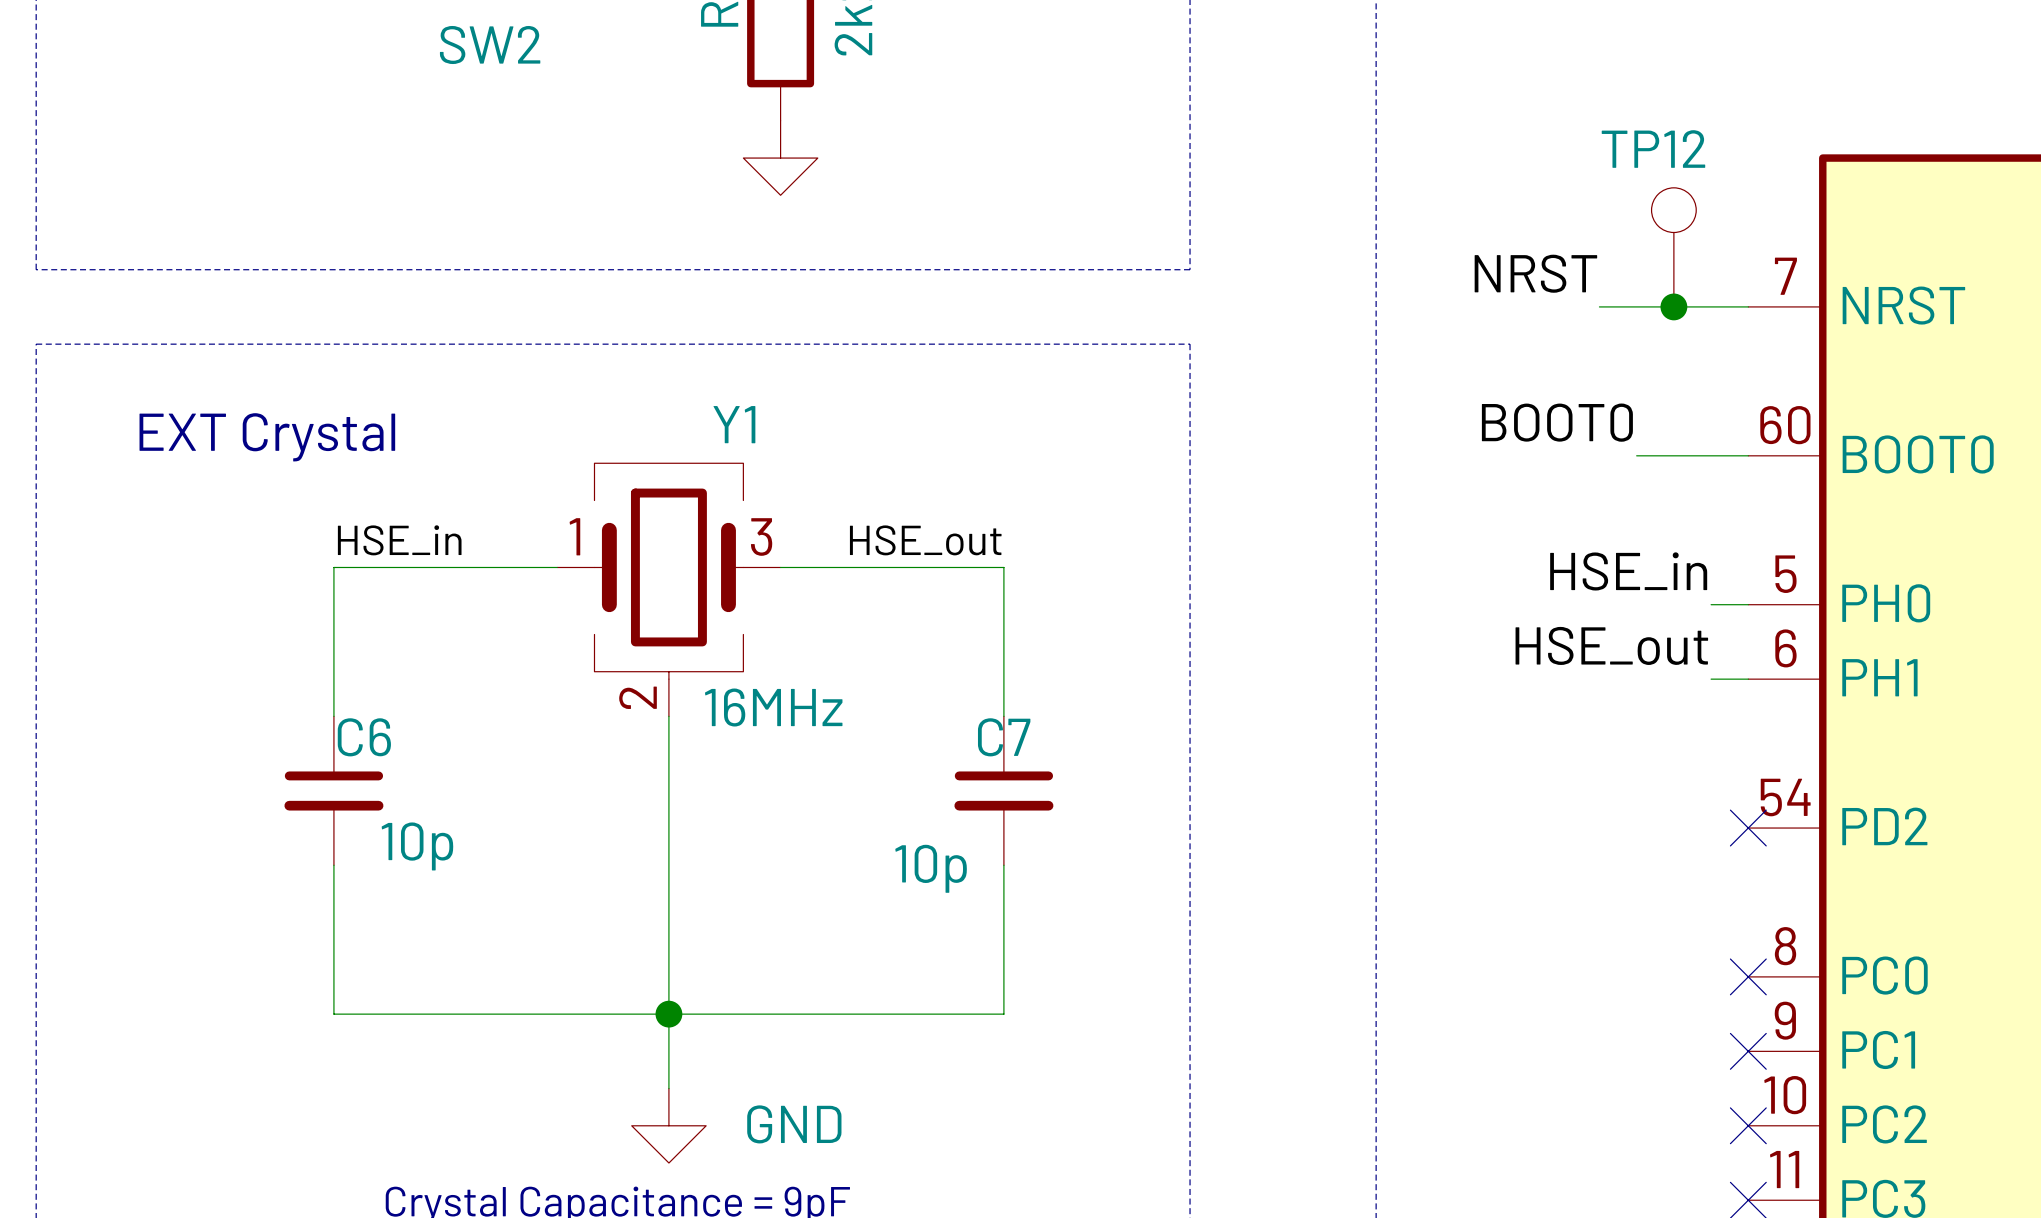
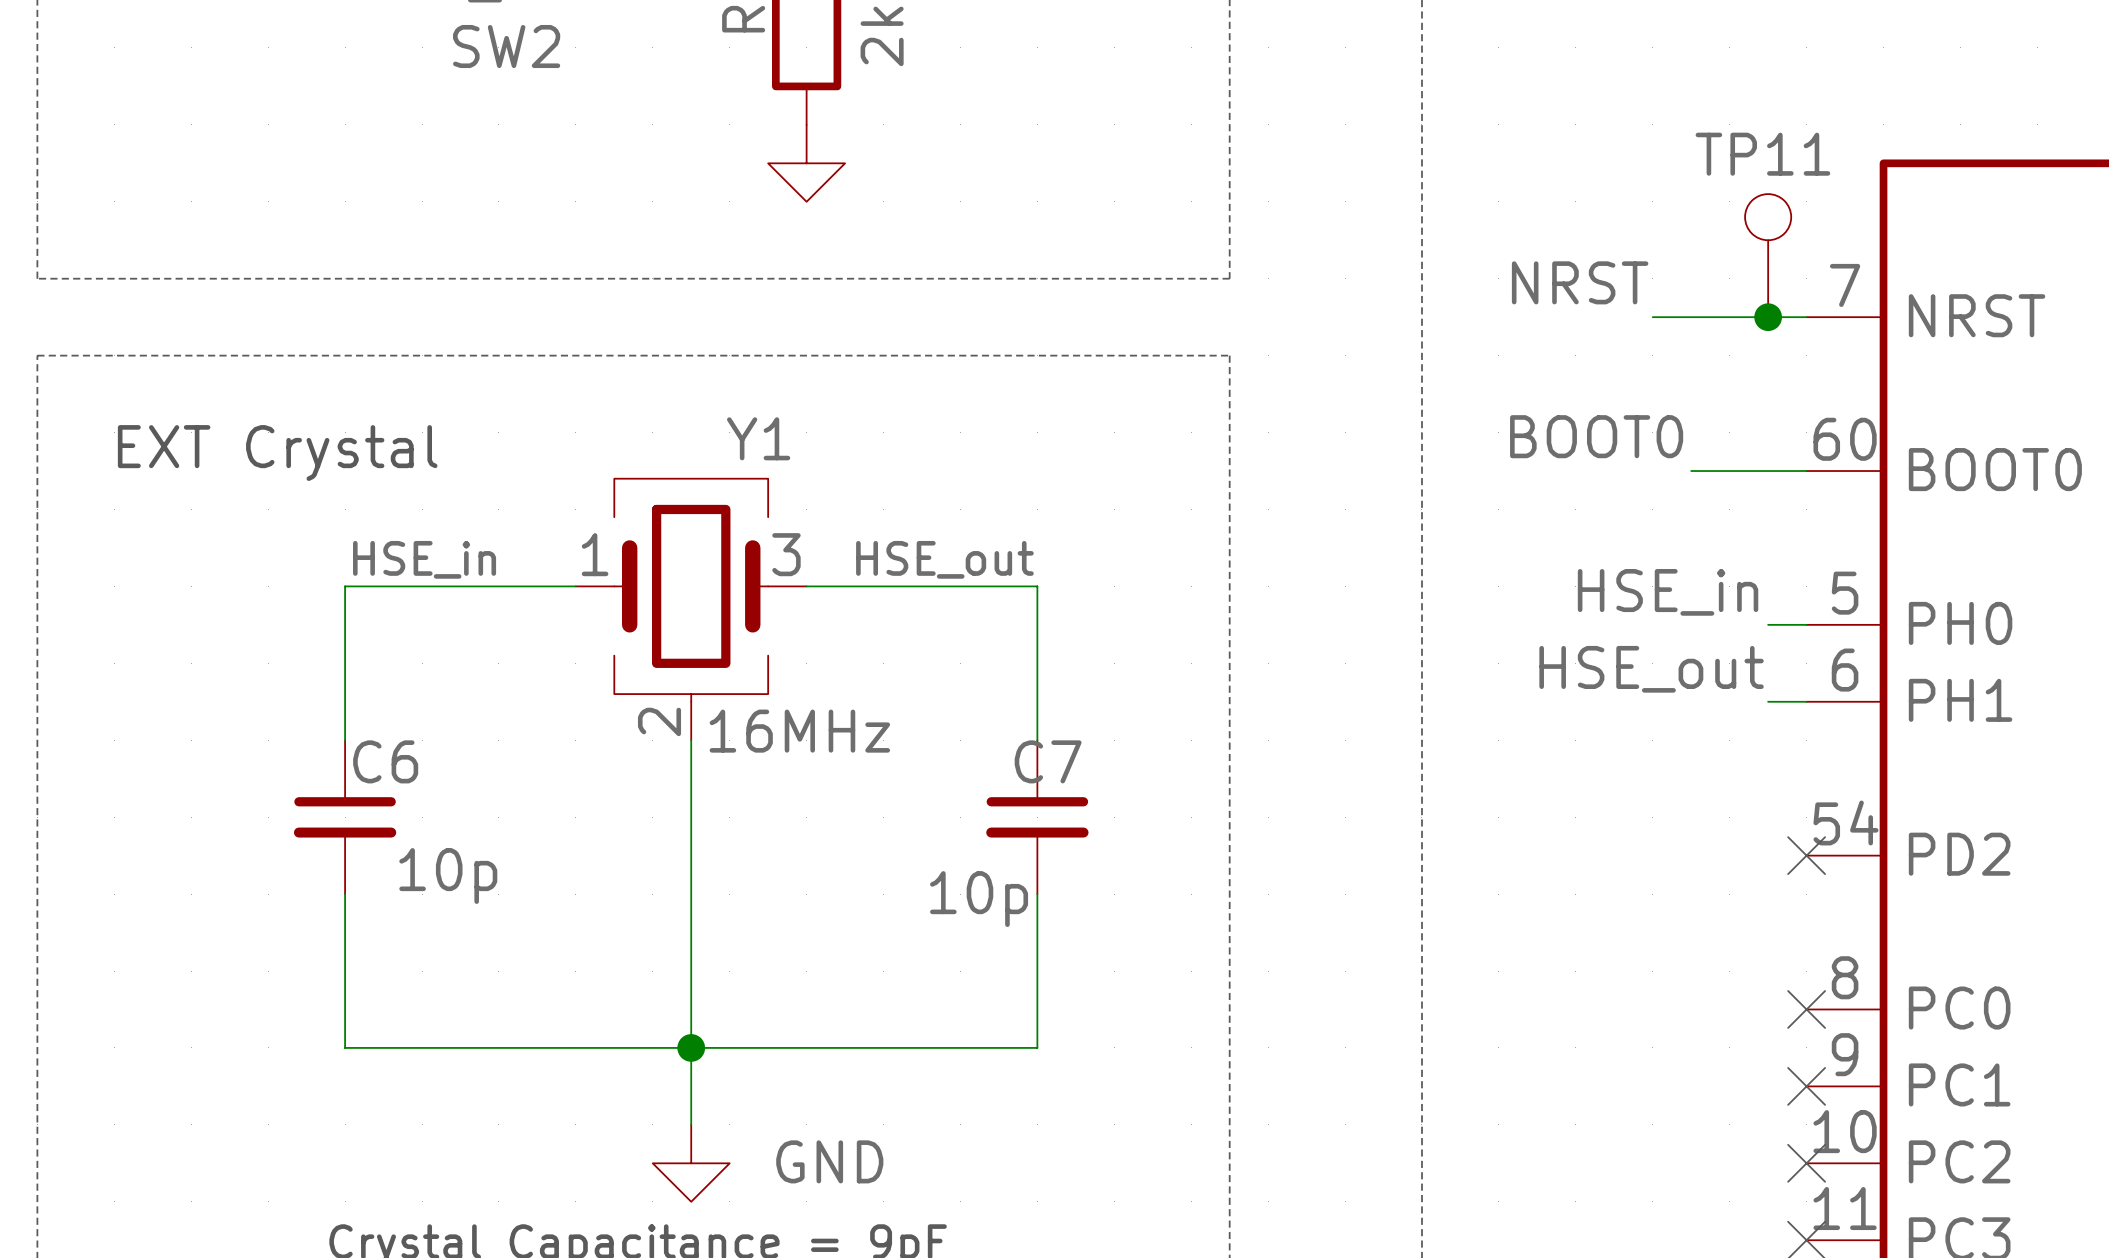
TP12: (1673, 247) -> none
TP11: none -> (1768, 255)
junction position: (1673, 306) -> (1768, 317)

